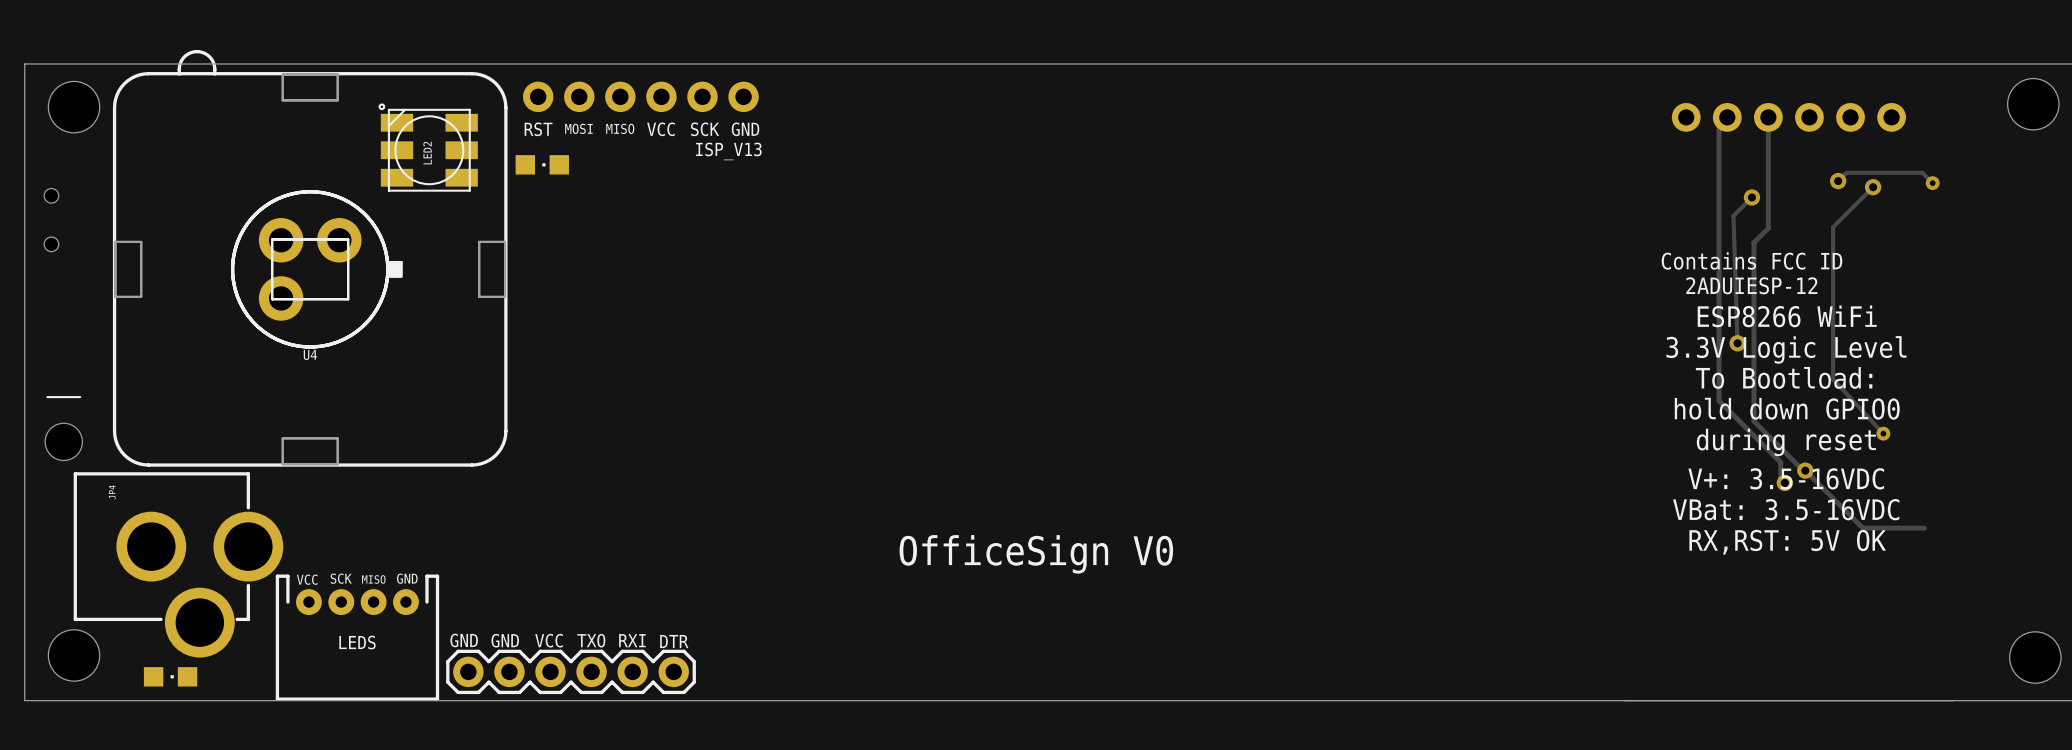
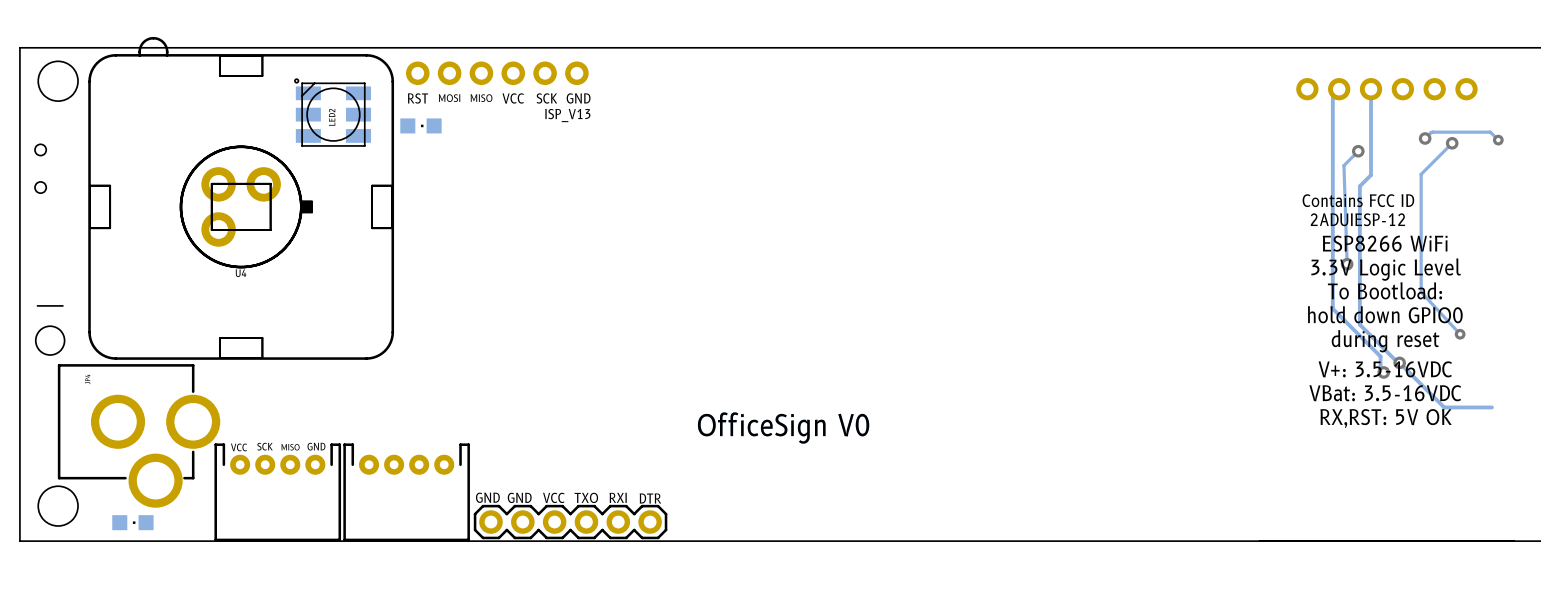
part: none -> (406, 492)
text: GND (464, 640) -> none
text: GND (505, 640) -> none
text position: VCC (549, 640) -> VCC (553, 497)
text position: TXO (591, 640) -> TXO (586, 497)
text: RXI (632, 640) -> GND (487, 497)
text position: DTR (674, 641) -> DTR (650, 498)
LEDS name: LEDS (357, 642) -> none
text: none -> GND (519, 497)
text: none -> RXI (618, 497)
part position: (571, 671) -> (570, 522)

